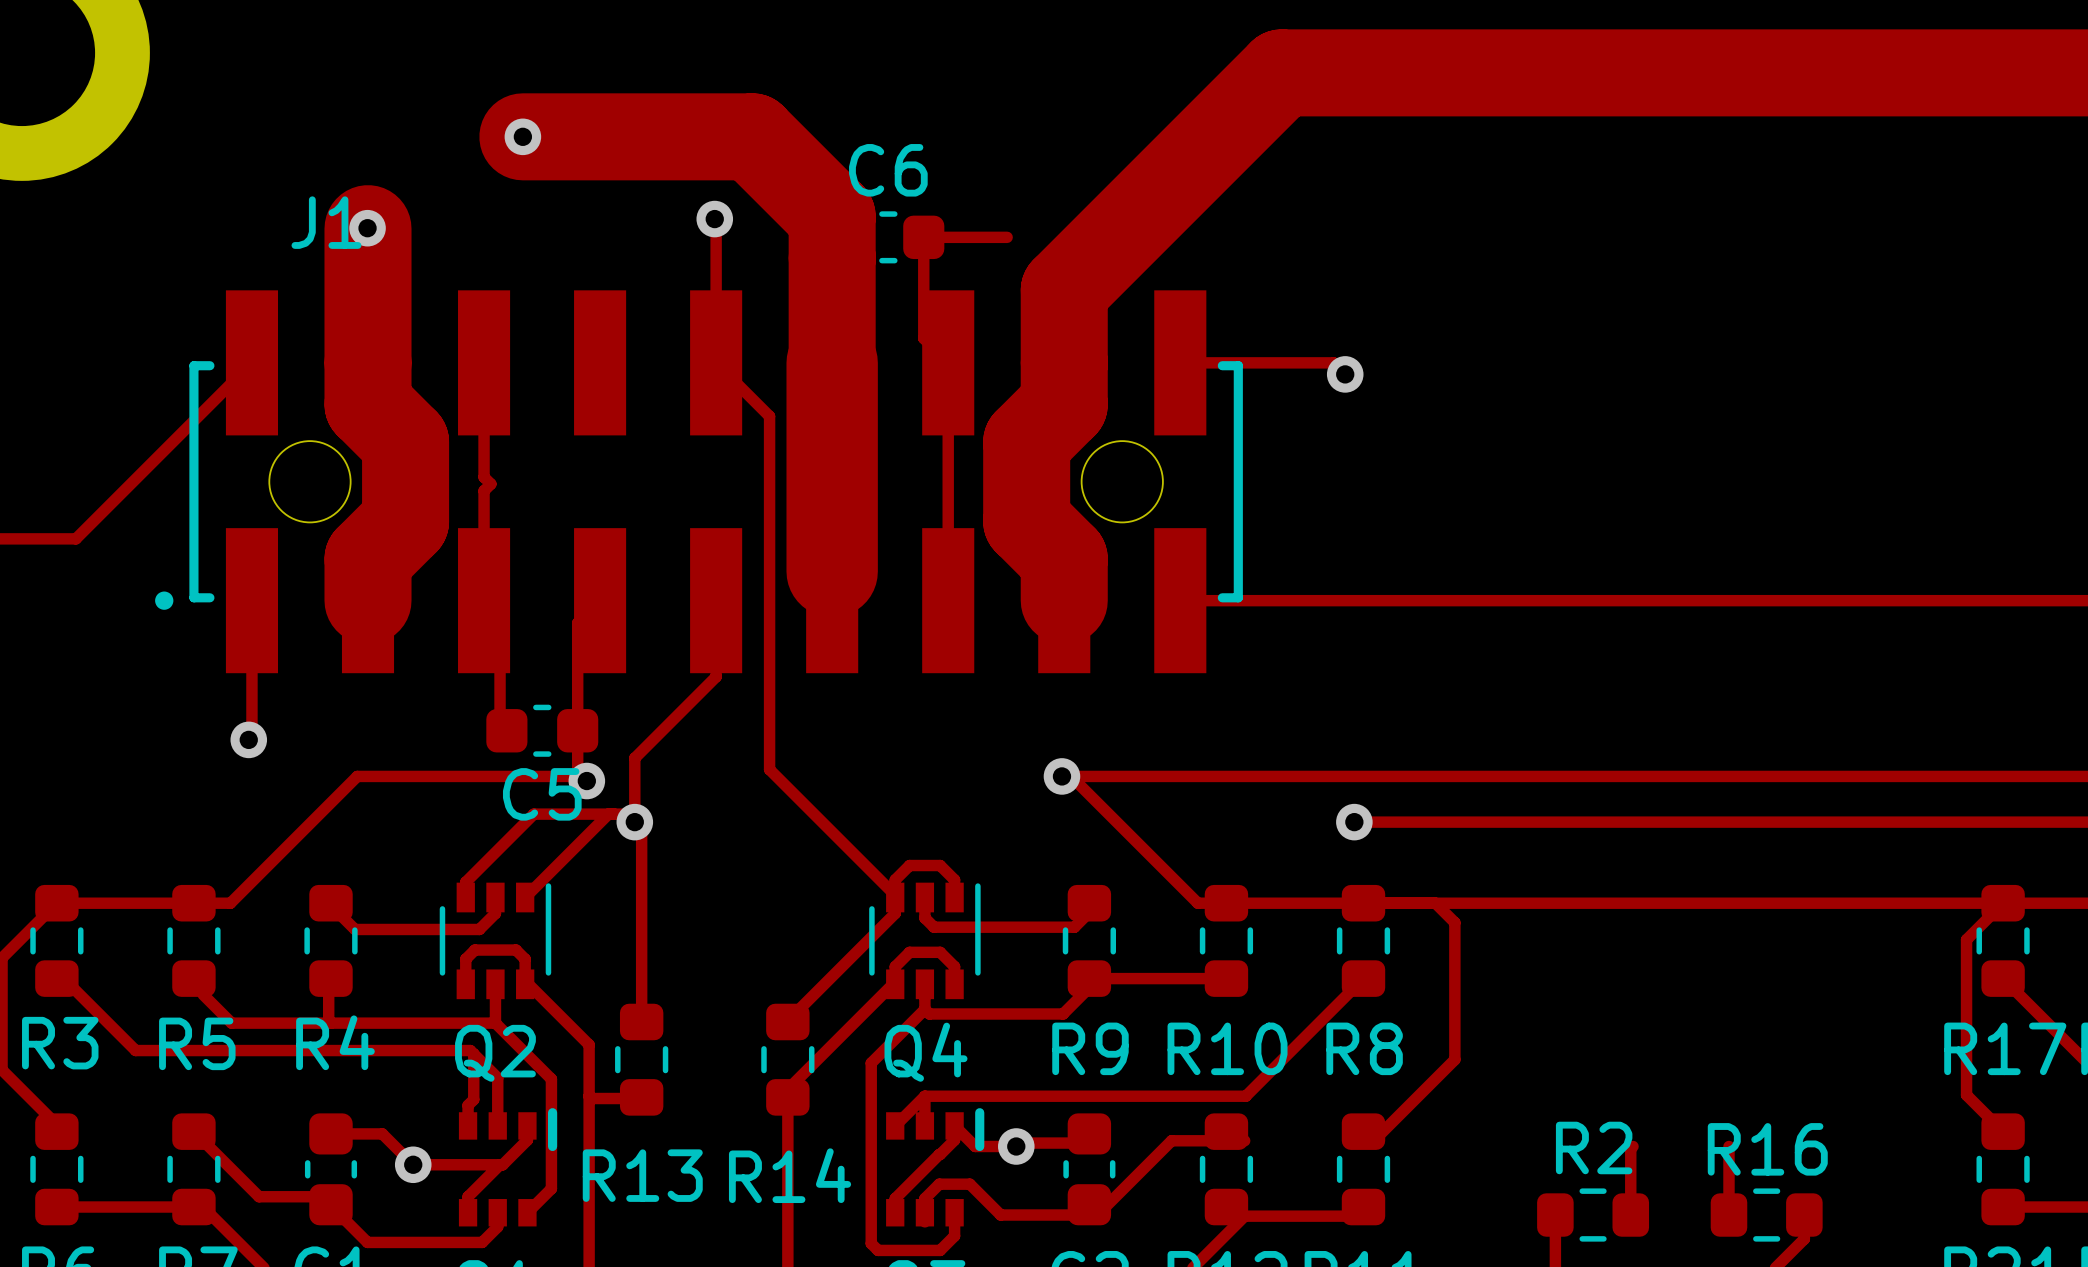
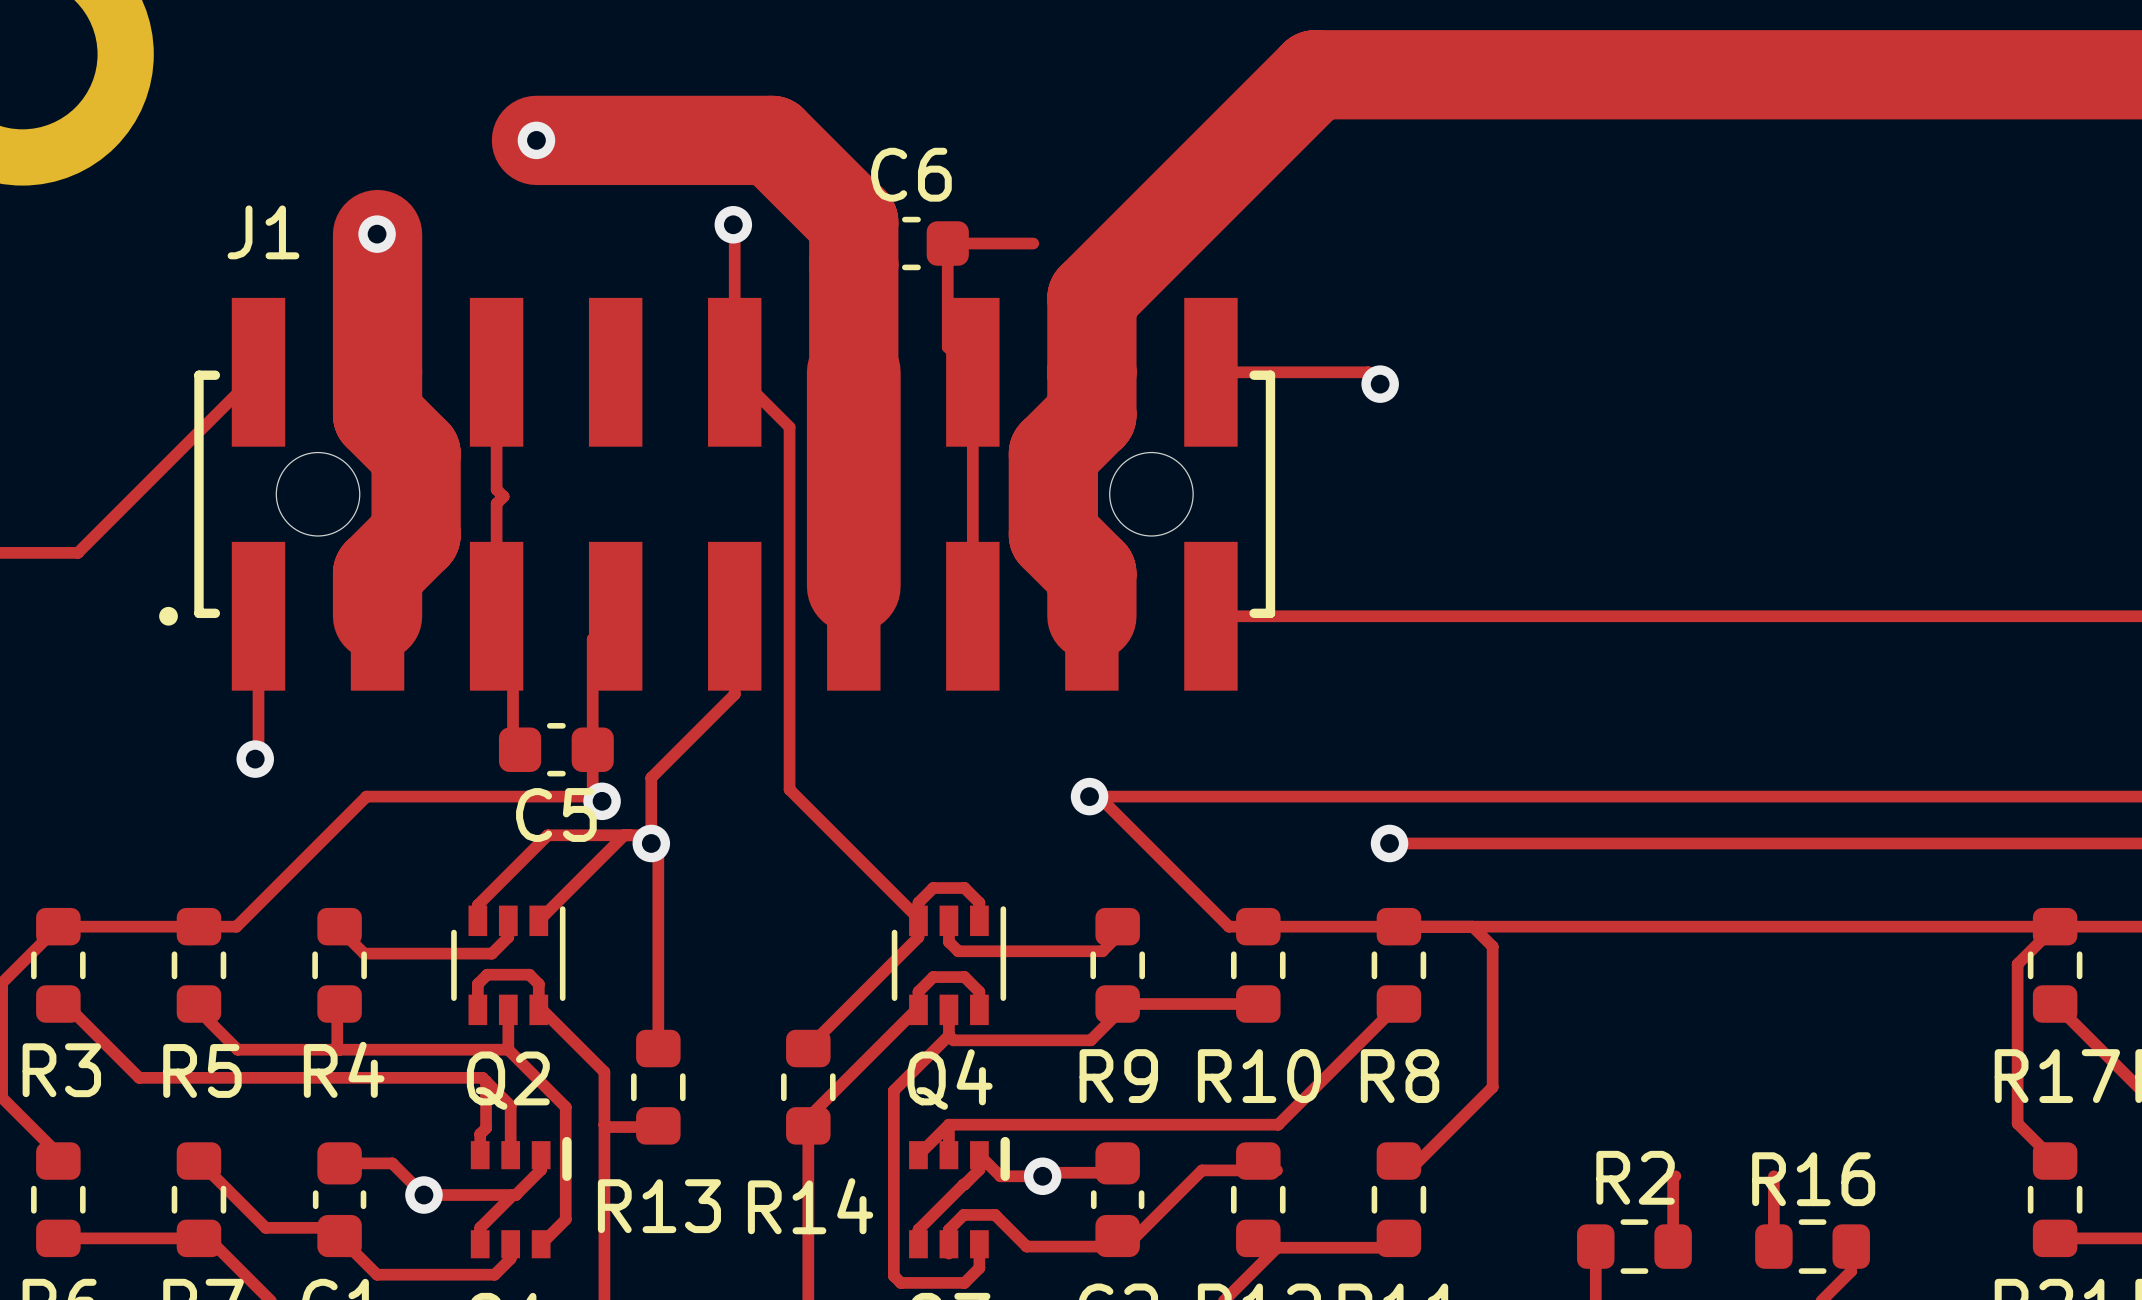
J1 name position: J1 (326, 222) -> J1 (263, 232)

